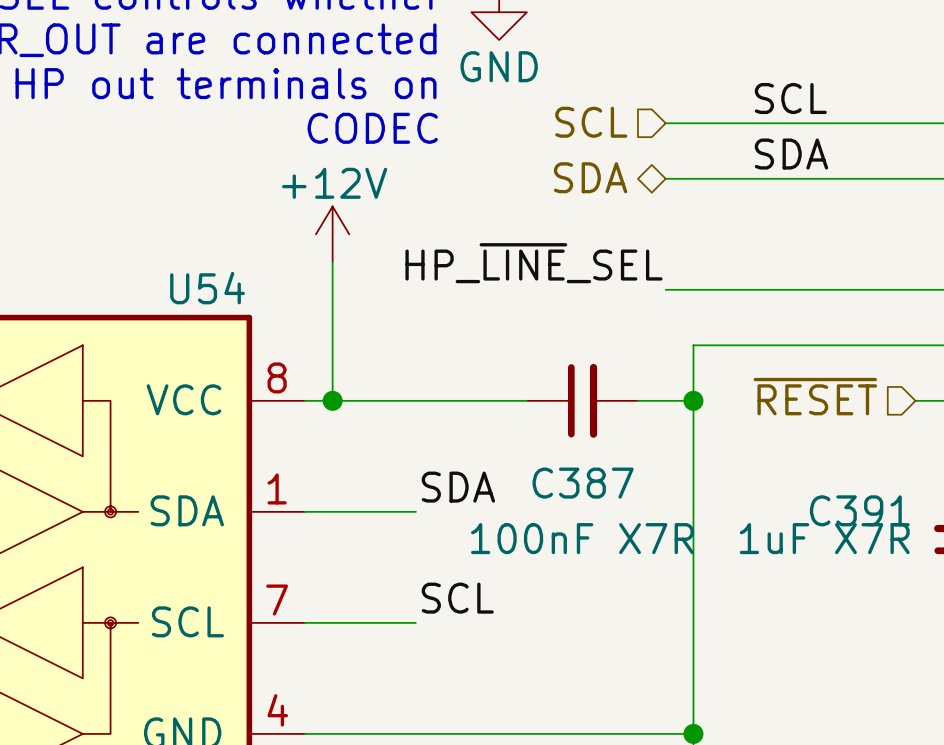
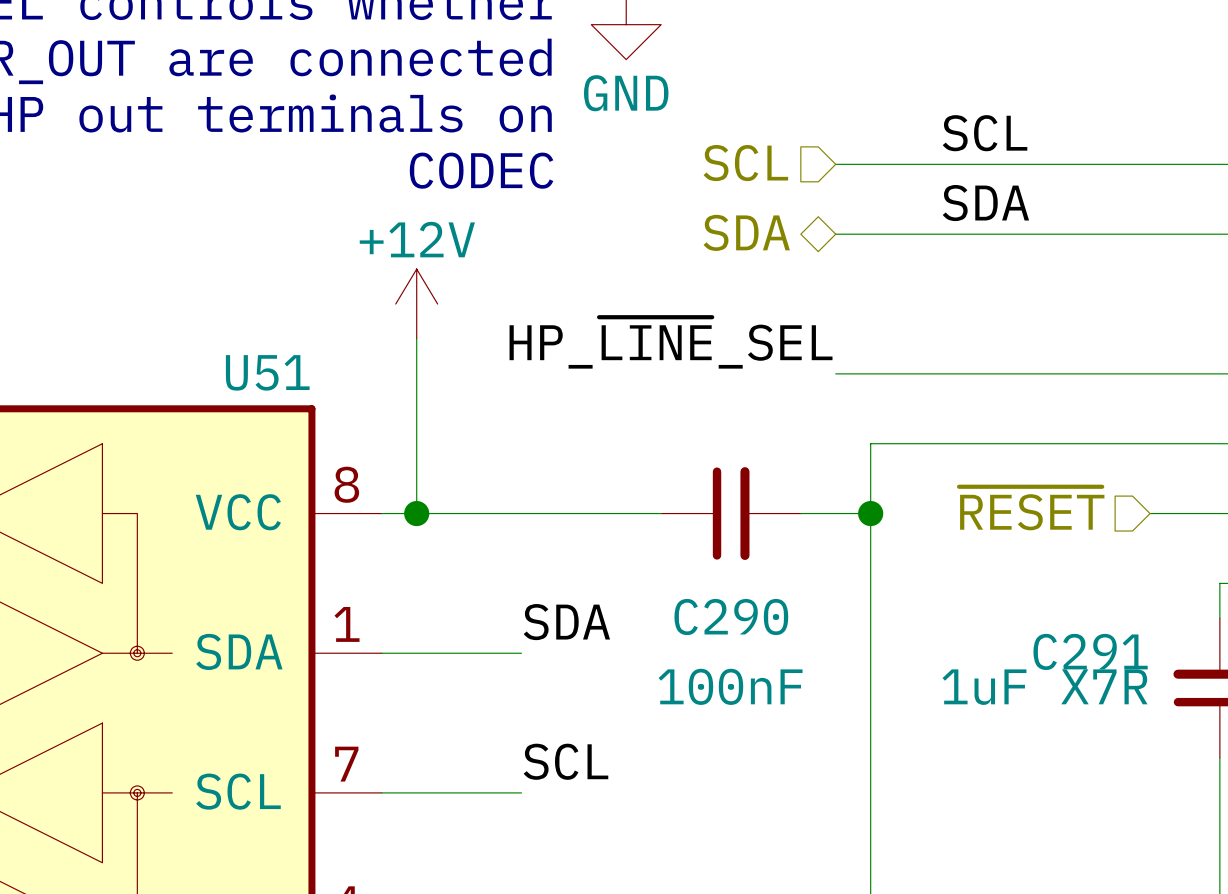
U54 name: U54 (207, 288) -> U51 (267, 372)
C387 name: C387 (583, 483) -> C290 (731, 617)
C391 name: C391 (859, 510) -> C291 (1090, 651)
C387 value: 100nF X7R (582, 538) -> 100nF (730, 686)

